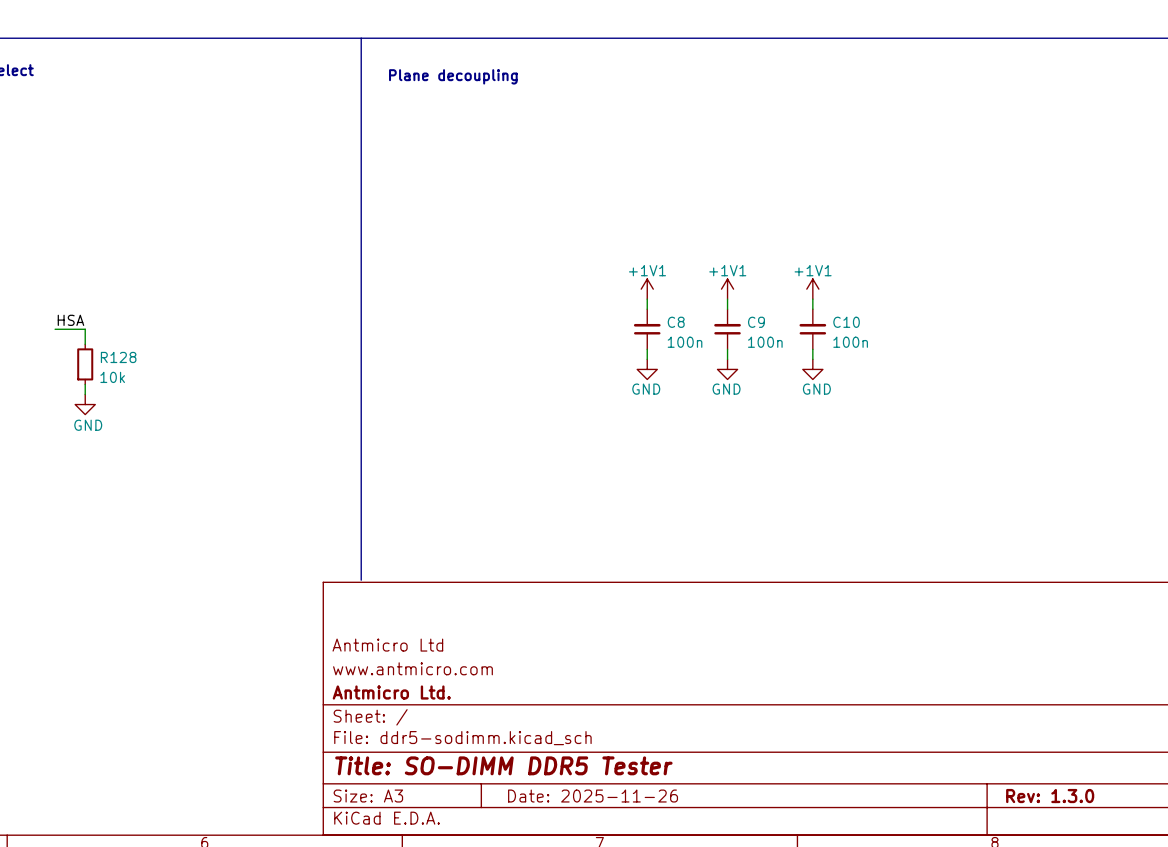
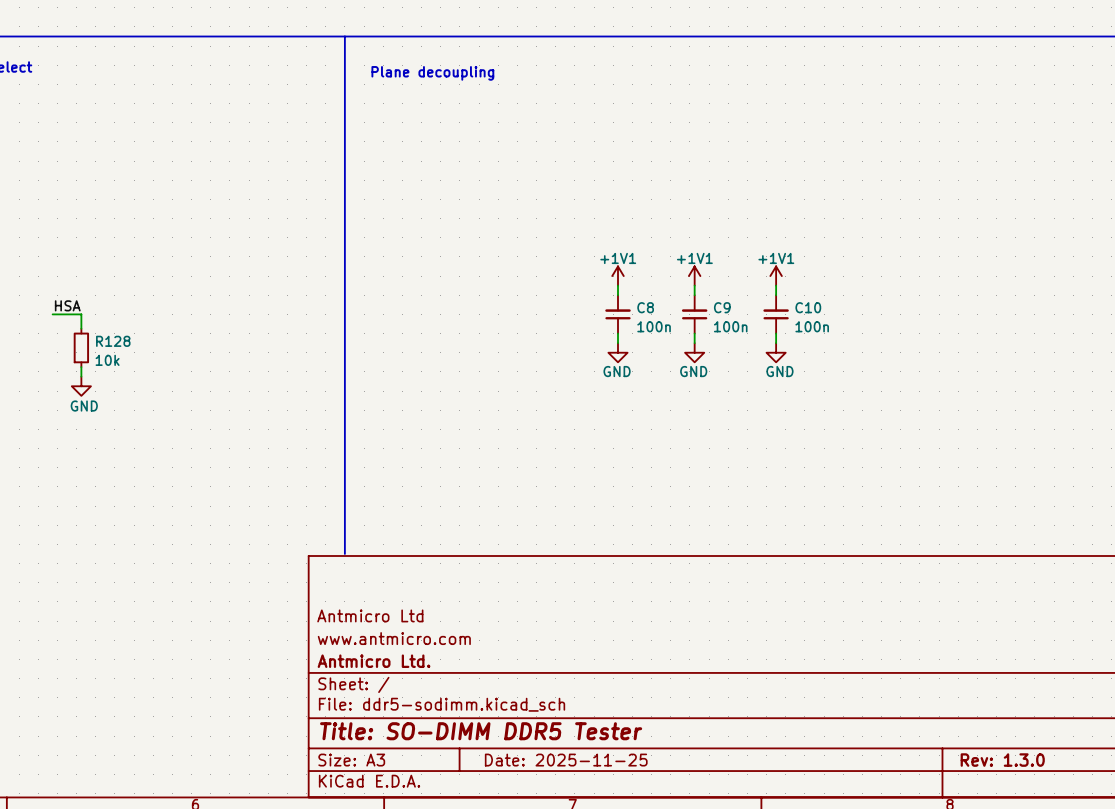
title block: Date: 2025-11-26 (593, 796) -> Date: 2025-11-25 (566, 760)

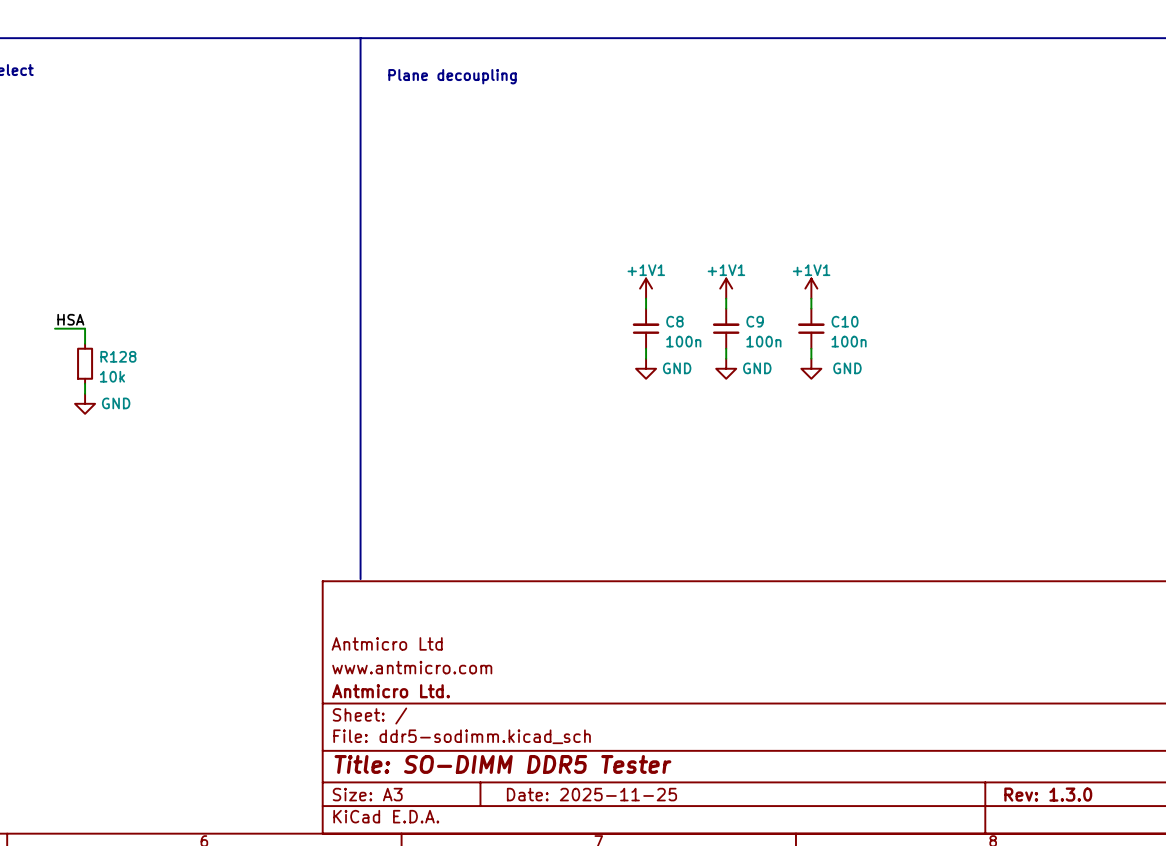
power symbol text position: GND (617, 371) -> GND (677, 368)
power symbol text position: GND (693, 371) -> GND (757, 368)
power symbol text position: GND (779, 371) -> GND (847, 368)
power symbol text position: GND (84, 406) -> GND (116, 403)

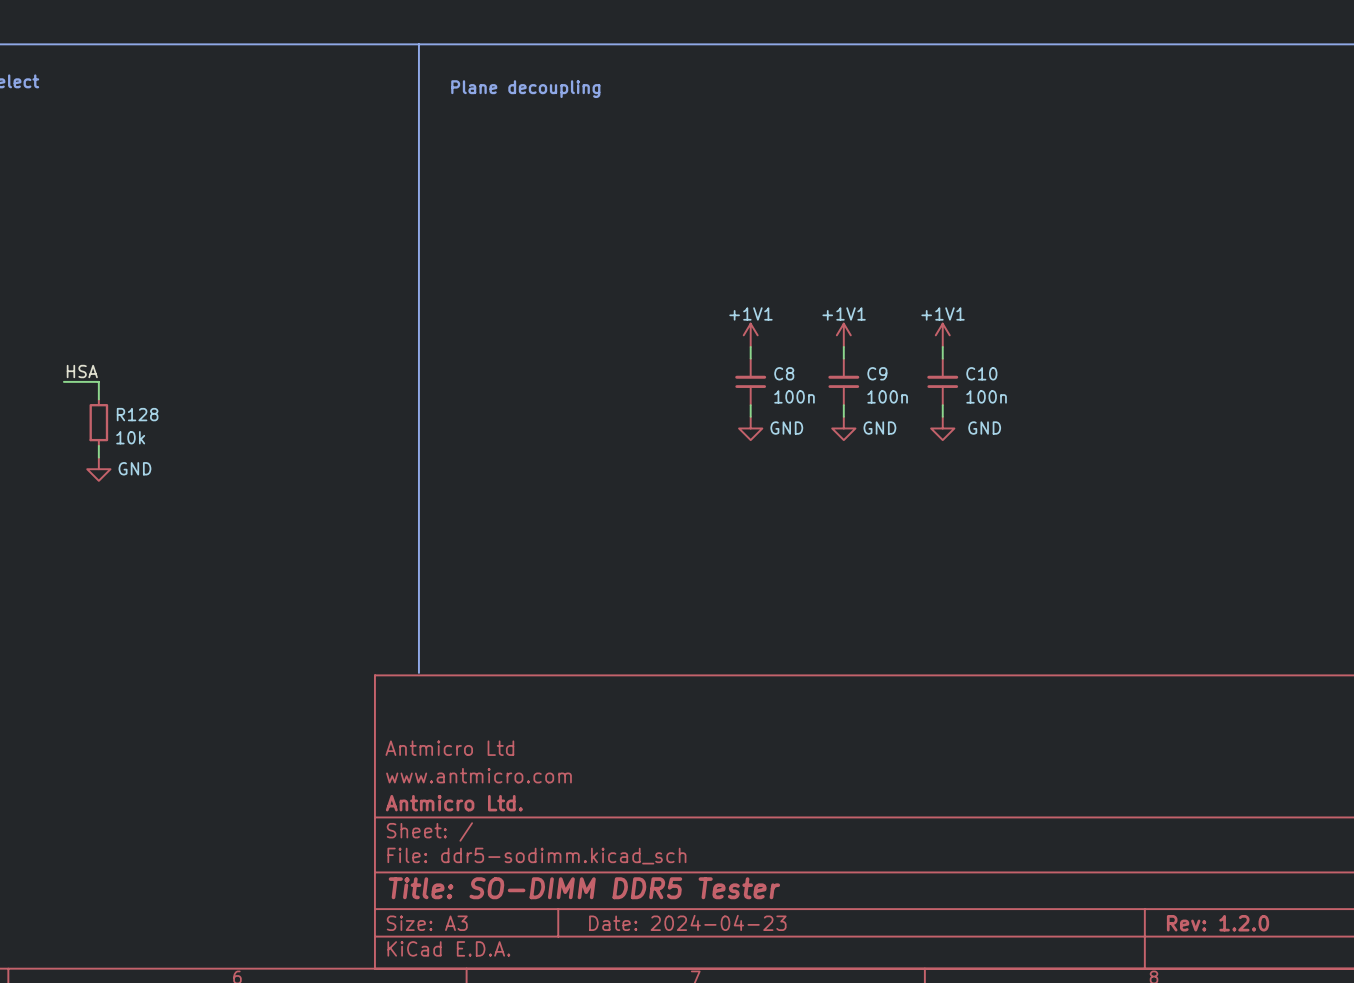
title block: Date: 2025-11-25 (591, 794) -> Date: 2024-04-23 (687, 922)
title block: Rev: 1.3.0 (1048, 794) -> Rev: 1.2.0 (1218, 923)

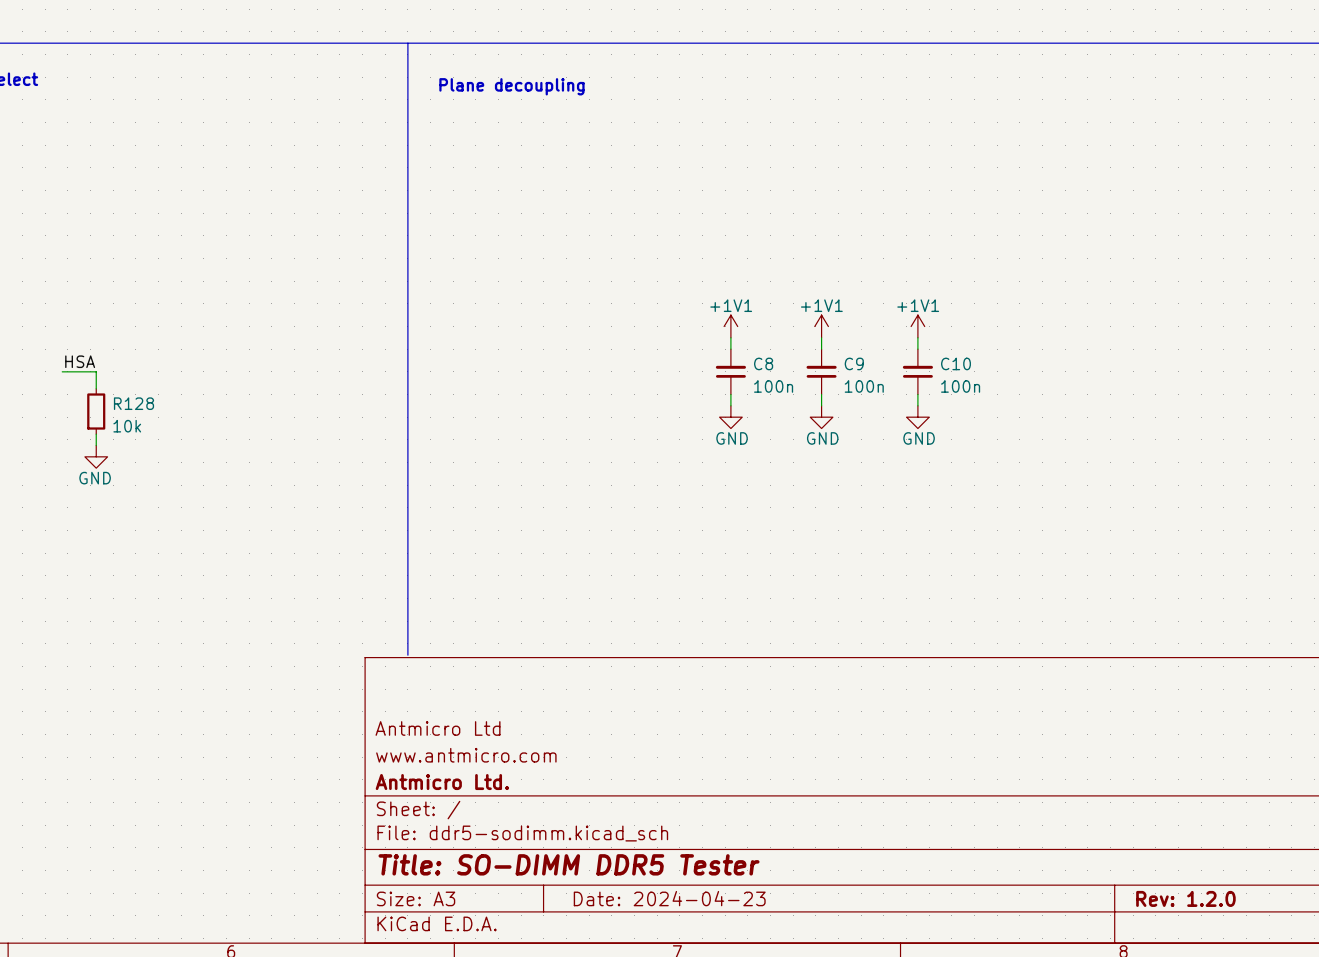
power symbol text position: GND (786, 428) -> GND (732, 438)
power symbol text position: GND (879, 428) -> GND (822, 438)
power symbol text position: GND (984, 428) -> GND (919, 438)
power symbol text position: GND (134, 468) -> GND (95, 478)

